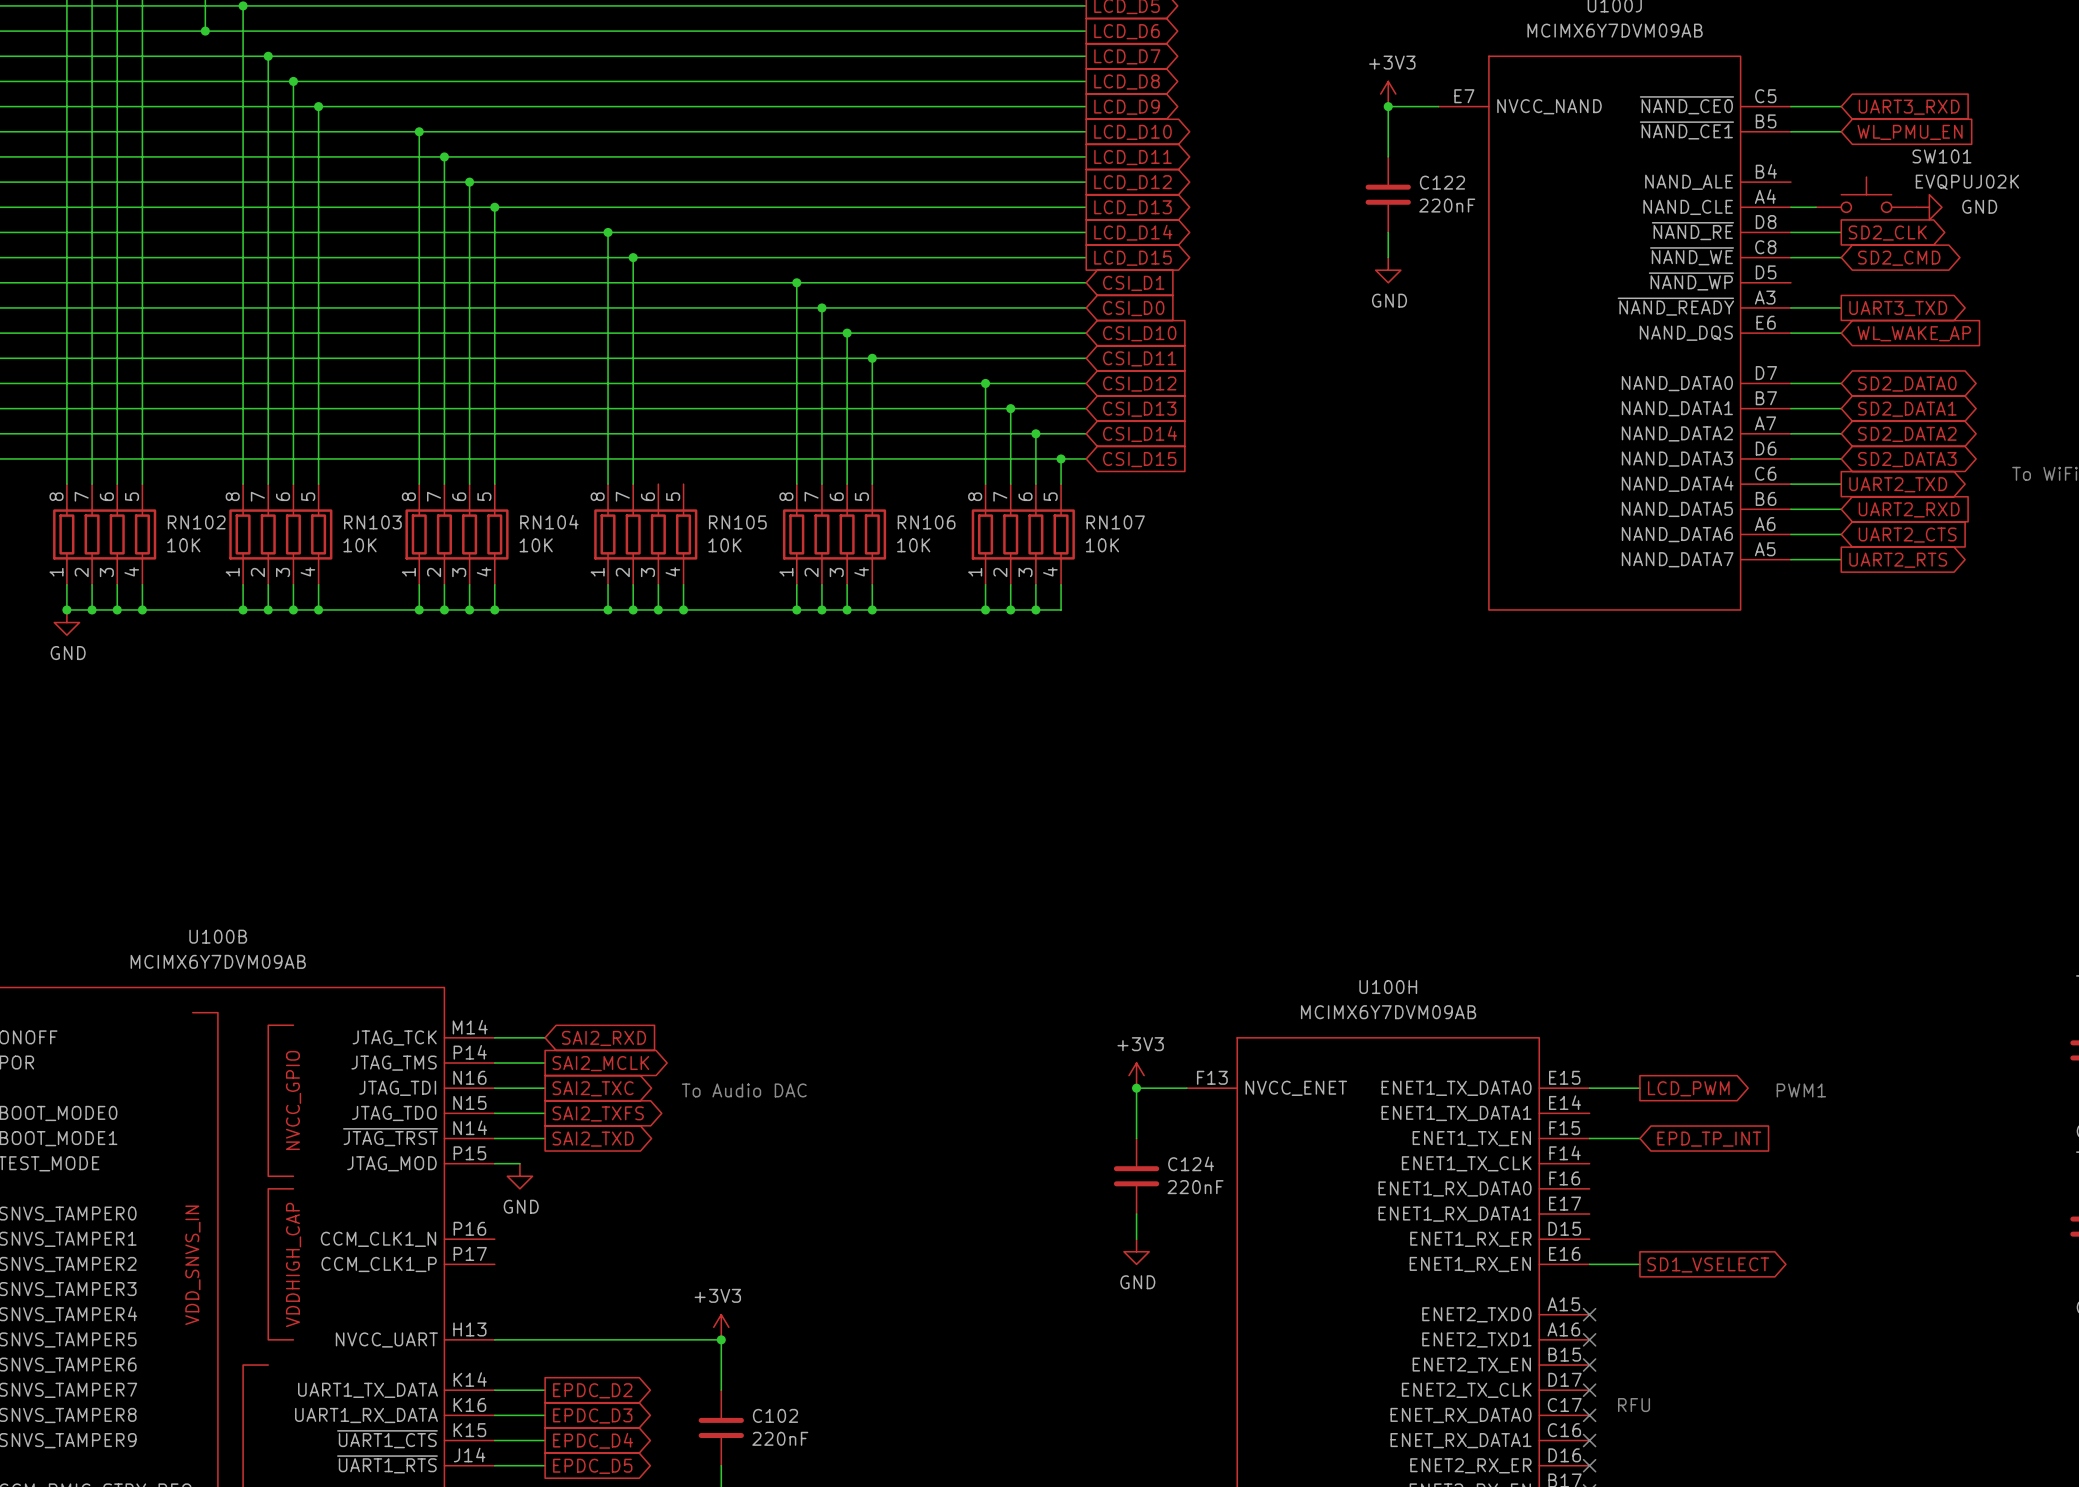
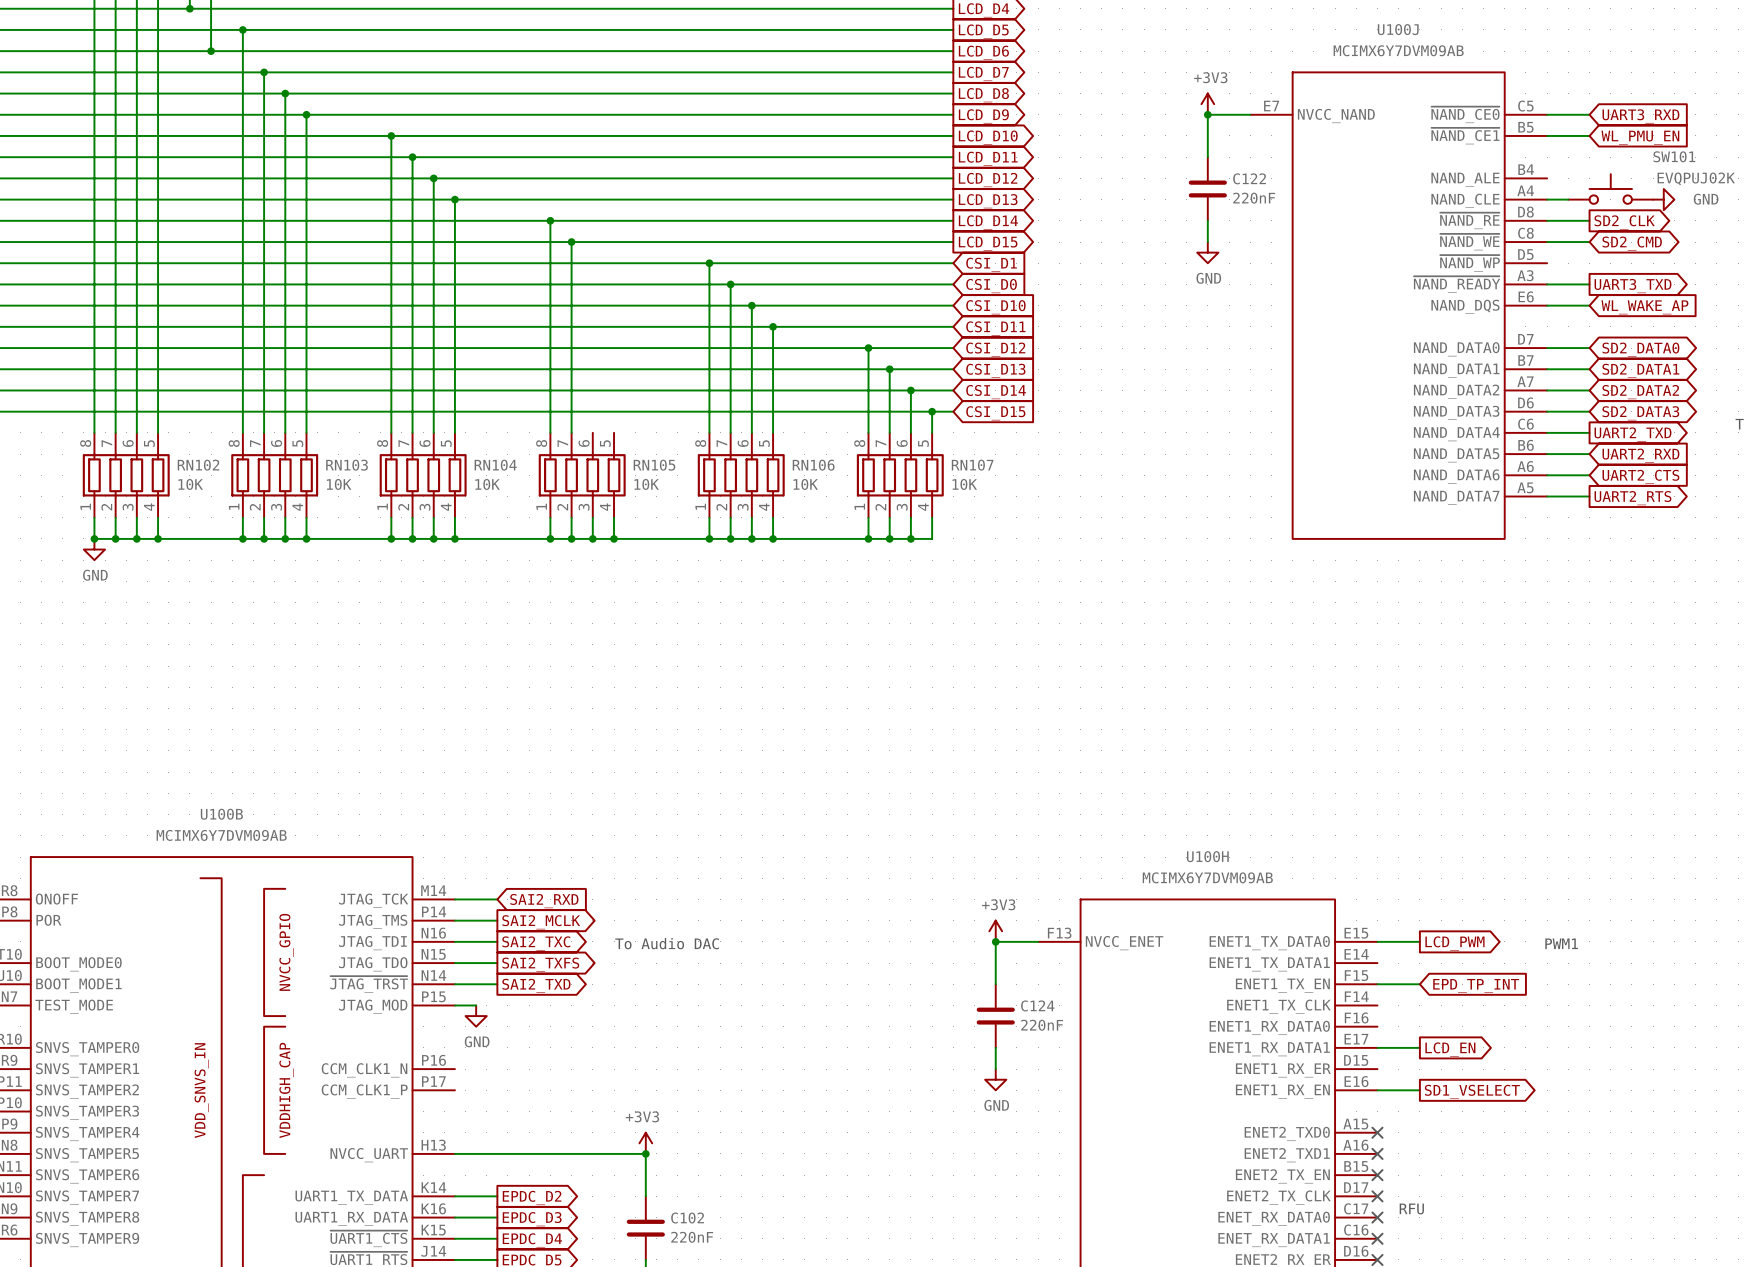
wire: none -> (1377, 1047) (1419, 1047)
global label: none -> LCD_EN (1450, 1049)

